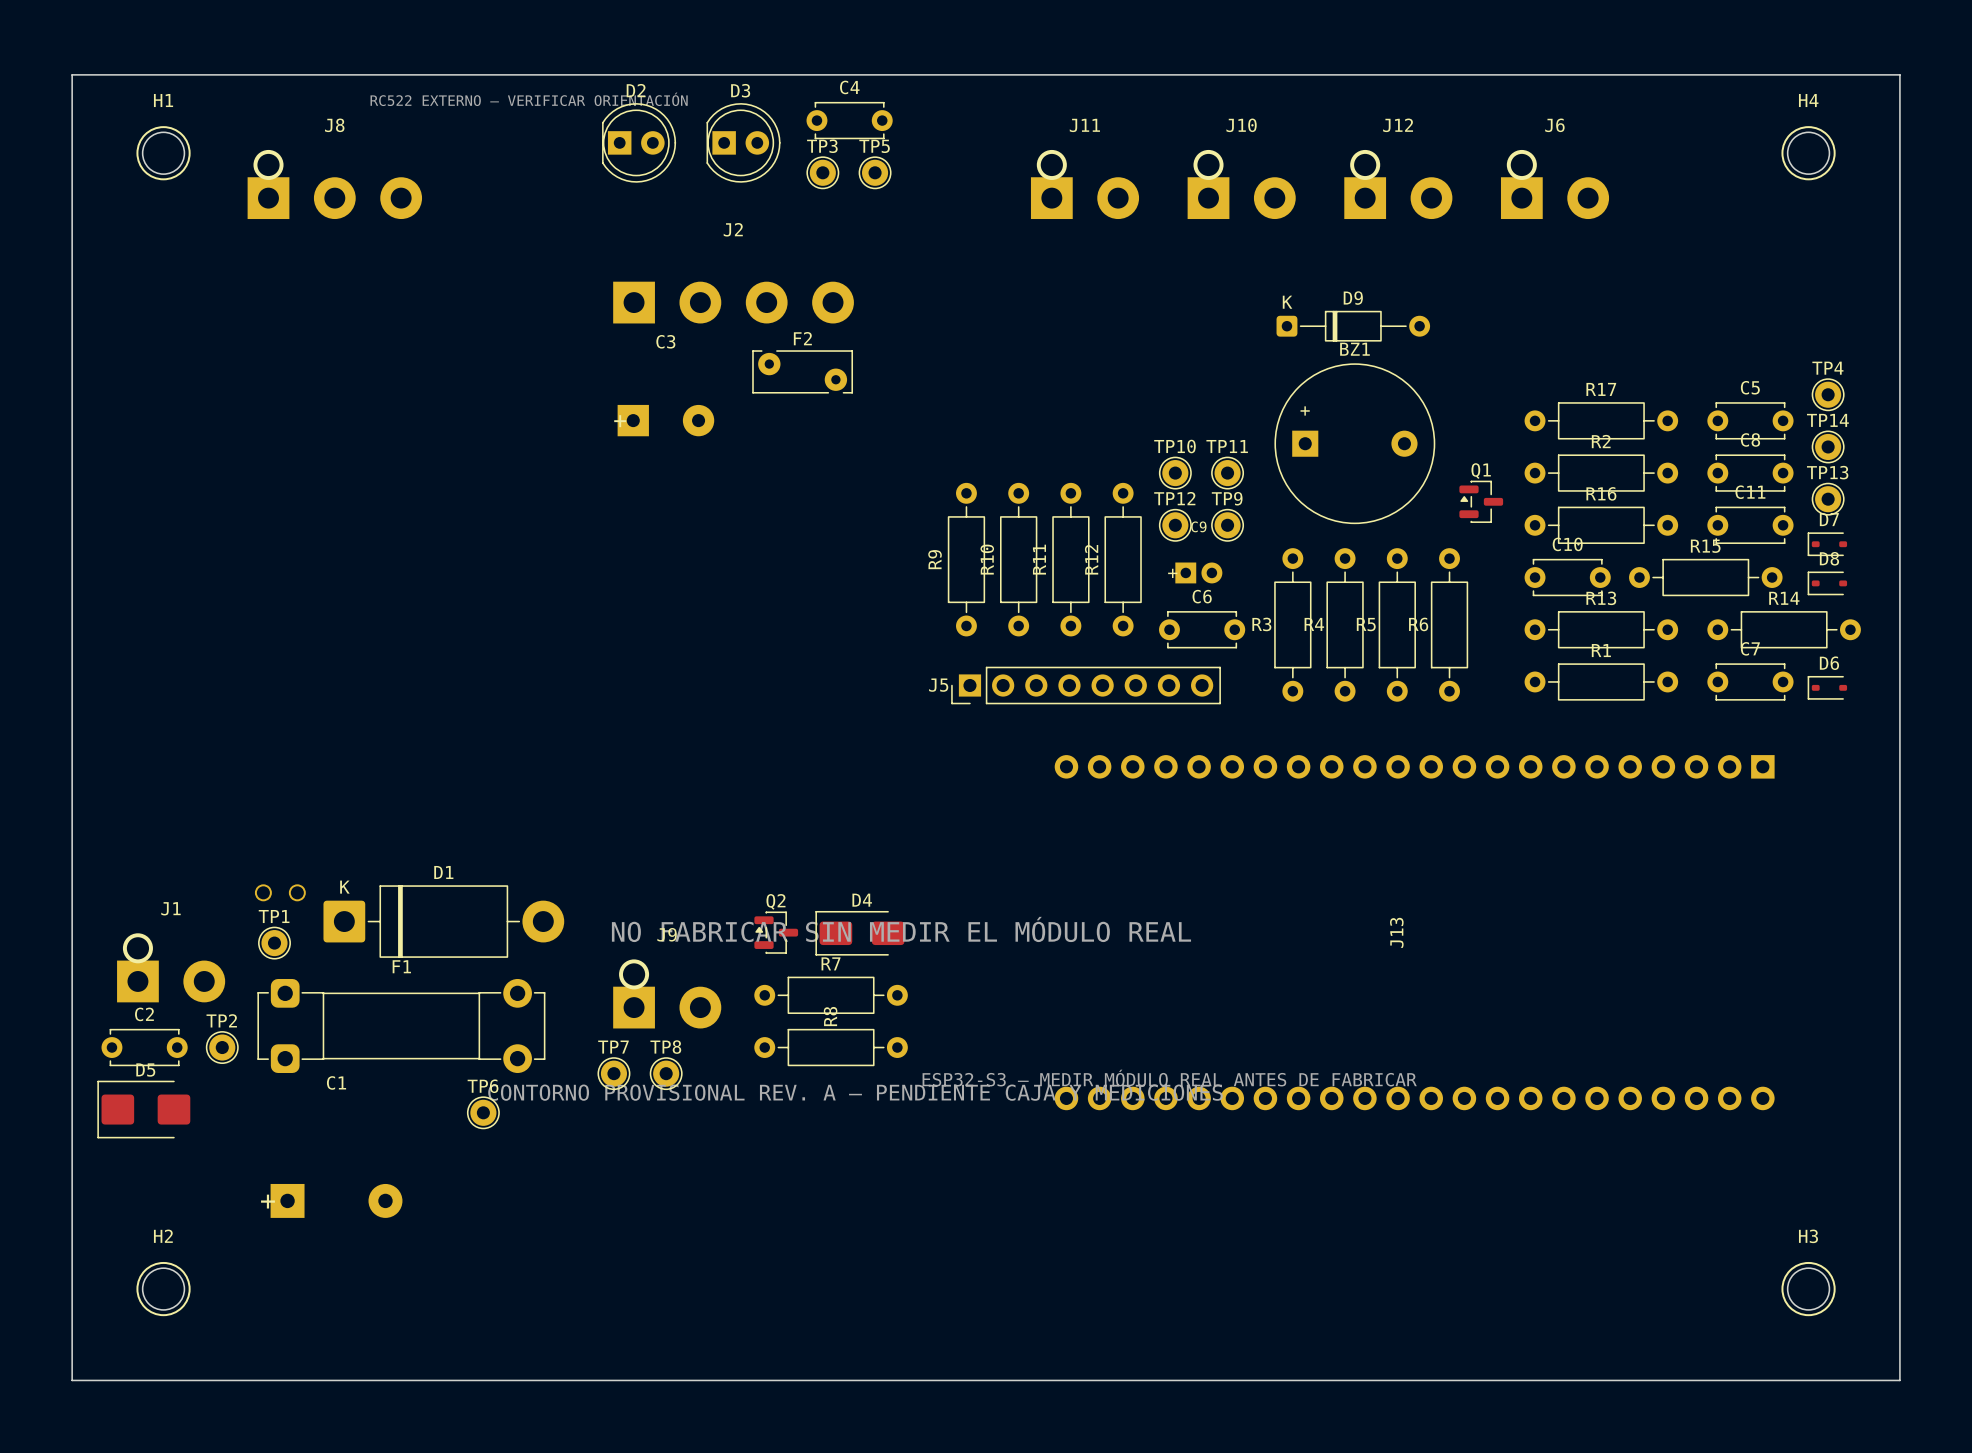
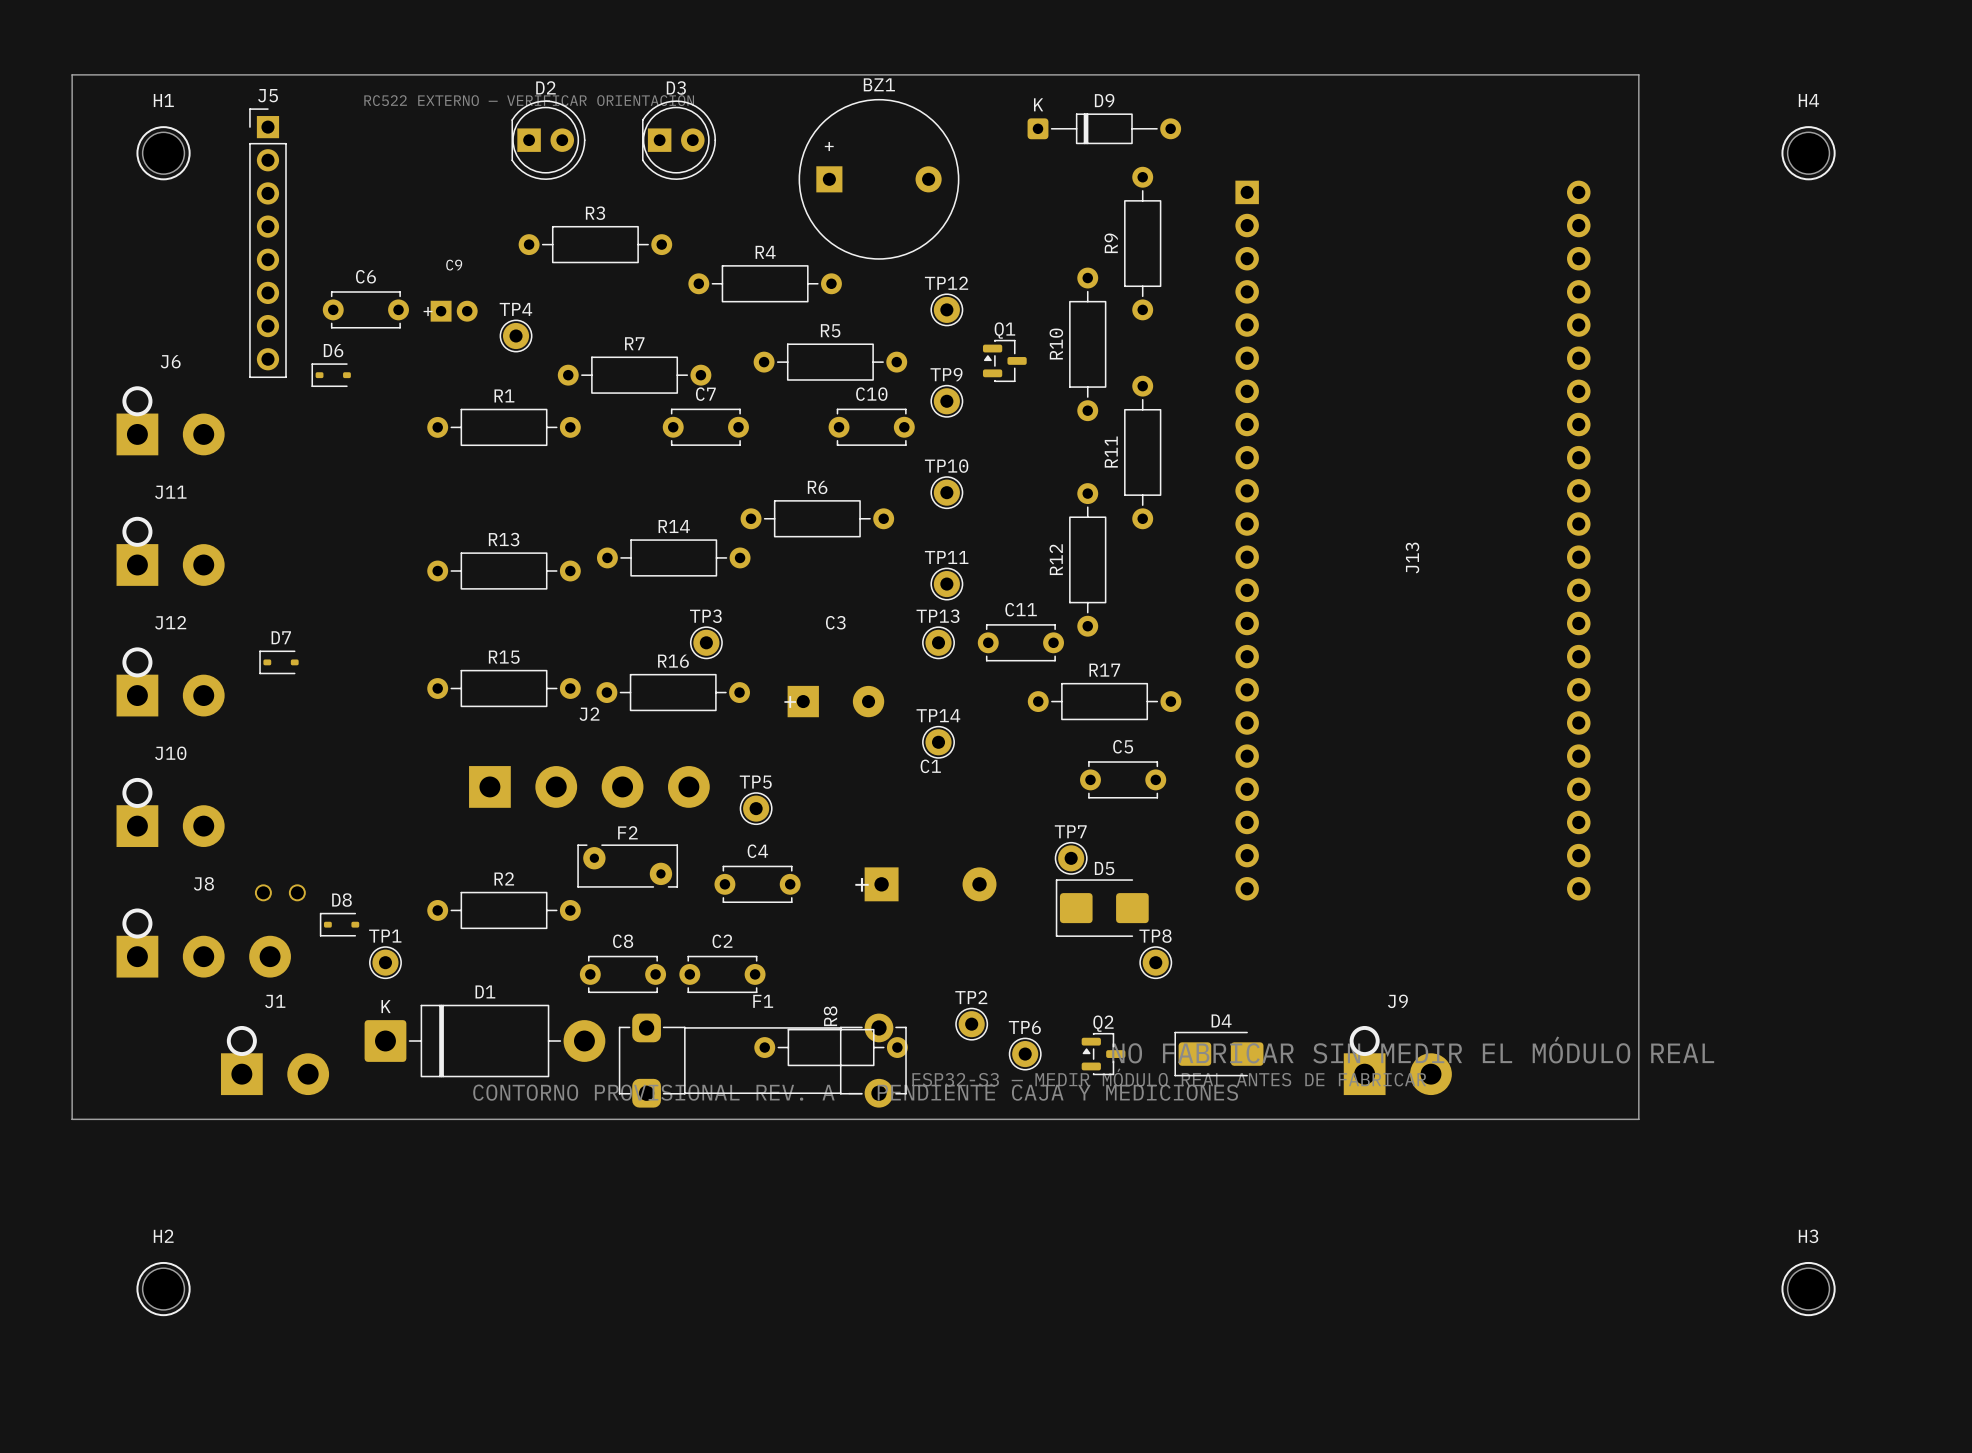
board edge: (1638, 74) (1899, 74) (1899, 1380) (72, 1380) (72, 1119) -> (1638, 74) (1638, 1119) (72, 1119)
C4 position: (849, 120) -> (757, 884)
D2 position: (639, 142) -> (548, 140)
D3 position: (743, 142) -> (679, 140)
TP3 position: (822, 172) -> (706, 642)
TP5 position: (875, 172) -> (756, 808)
J8 position: (334, 184) -> (203, 943)
J11 position: (1085, 184) -> (170, 551)
J10 position: (1241, 184) -> (170, 812)
J12 position: (1398, 184) -> (170, 681)
J6 position: (1555, 184) -> (170, 420)
J2 position: (733, 302) -> (589, 786)
D9 position: (1353, 326) -> (1104, 128)
F2 position: (802, 371) -> (627, 866)
TP4 position: (1828, 394) -> (516, 336)
C3 position: (665, 420) -> (835, 701)
R17 position: (1601, 420) -> (1104, 701)
C5 position: (1750, 420) -> (1123, 779)
BZ1 position: (1354, 443) -> (878, 179)
TP14 position: (1828, 446) -> (938, 742)
TP10 position: (1175, 473) -> (946, 492)
TP11 position: (1227, 473) -> (946, 584)
R2 position: (1601, 473) -> (504, 910)
C8 position: (1750, 473) -> (622, 974)
TP13 position: (1828, 499) -> (938, 642)
Q1 position: (1481, 501) -> (1004, 360)
TP12 position: (1175, 525) -> (946, 309)
TP9 position: (1227, 525) -> (946, 401)
R16 position: (1601, 525) -> (673, 692)
C11 position: (1750, 525) -> (1020, 642)
D7 position: (1827, 544) -> (278, 662)
R9 position: (966, 559) -> (1142, 243)
R10 position: (1018, 559) -> (1087, 344)
R11 position: (1070, 559) -> (1142, 452)
R12 position: (1123, 559) -> (1087, 559)
C9 position: (1198, 572) -> (454, 311)
C10 position: (1567, 577) -> (871, 427)
R15 position: (1705, 577) -> (504, 688)
D8 position: (1827, 583) -> (339, 924)
R3 rotation: 0° (1292, 624) -> 90° clockwise (595, 244)
R3 position: (1292, 624) -> (595, 244)
R4 rotation: 0° (1345, 624) -> 90° clockwise (765, 283)
R4 position: (1345, 624) -> (765, 283)
R5 rotation: 0° (1397, 624) -> 90° clockwise (830, 362)
R5 position: (1397, 624) -> (830, 362)
R6 rotation: 0° (1449, 624) -> 90° clockwise (817, 518)
R6 position: (1449, 624) -> (817, 518)
C6 position: (1202, 629) -> (365, 309)
R13 position: (1601, 629) -> (504, 571)
R14 position: (1784, 629) -> (673, 557)
R1 position: (1601, 681) -> (504, 427)
C7 position: (1750, 681) -> (705, 427)
J5 rotation: 0° (1086, 685) -> 90° clockwise (267, 243)
J5 position: (1086, 685) -> (267, 243)
D6 position: (1827, 687) -> (331, 375)
D1 position: (443, 921) -> (484, 1041)
Q2 position: (776, 932) -> (1103, 1054)
J13 rotation: 0° (1414, 932) -> 90° counterclockwise (1412, 540)
D4 position: (859, 933) -> (1218, 1054)
TP1 position: (274, 943) -> (385, 962)
J1 position: (171, 967) -> (275, 1060)
J9 position: (667, 993) -> (1397, 1060)
R7 position: (831, 995) -> (634, 375)
F1 position: (401, 1025) -> (762, 1060)
C2 position: (144, 1047) -> (722, 974)
TP2 position: (222, 1047) -> (971, 1024)
TP7 position: (613, 1073) -> (1071, 858)
TP8 position: (666, 1073) -> (1155, 962)
D5 position: (143, 1109) -> (1102, 908)
TP6 position: (483, 1112) -> (1025, 1054)
C1 position: (336, 1200) -> (930, 884)

